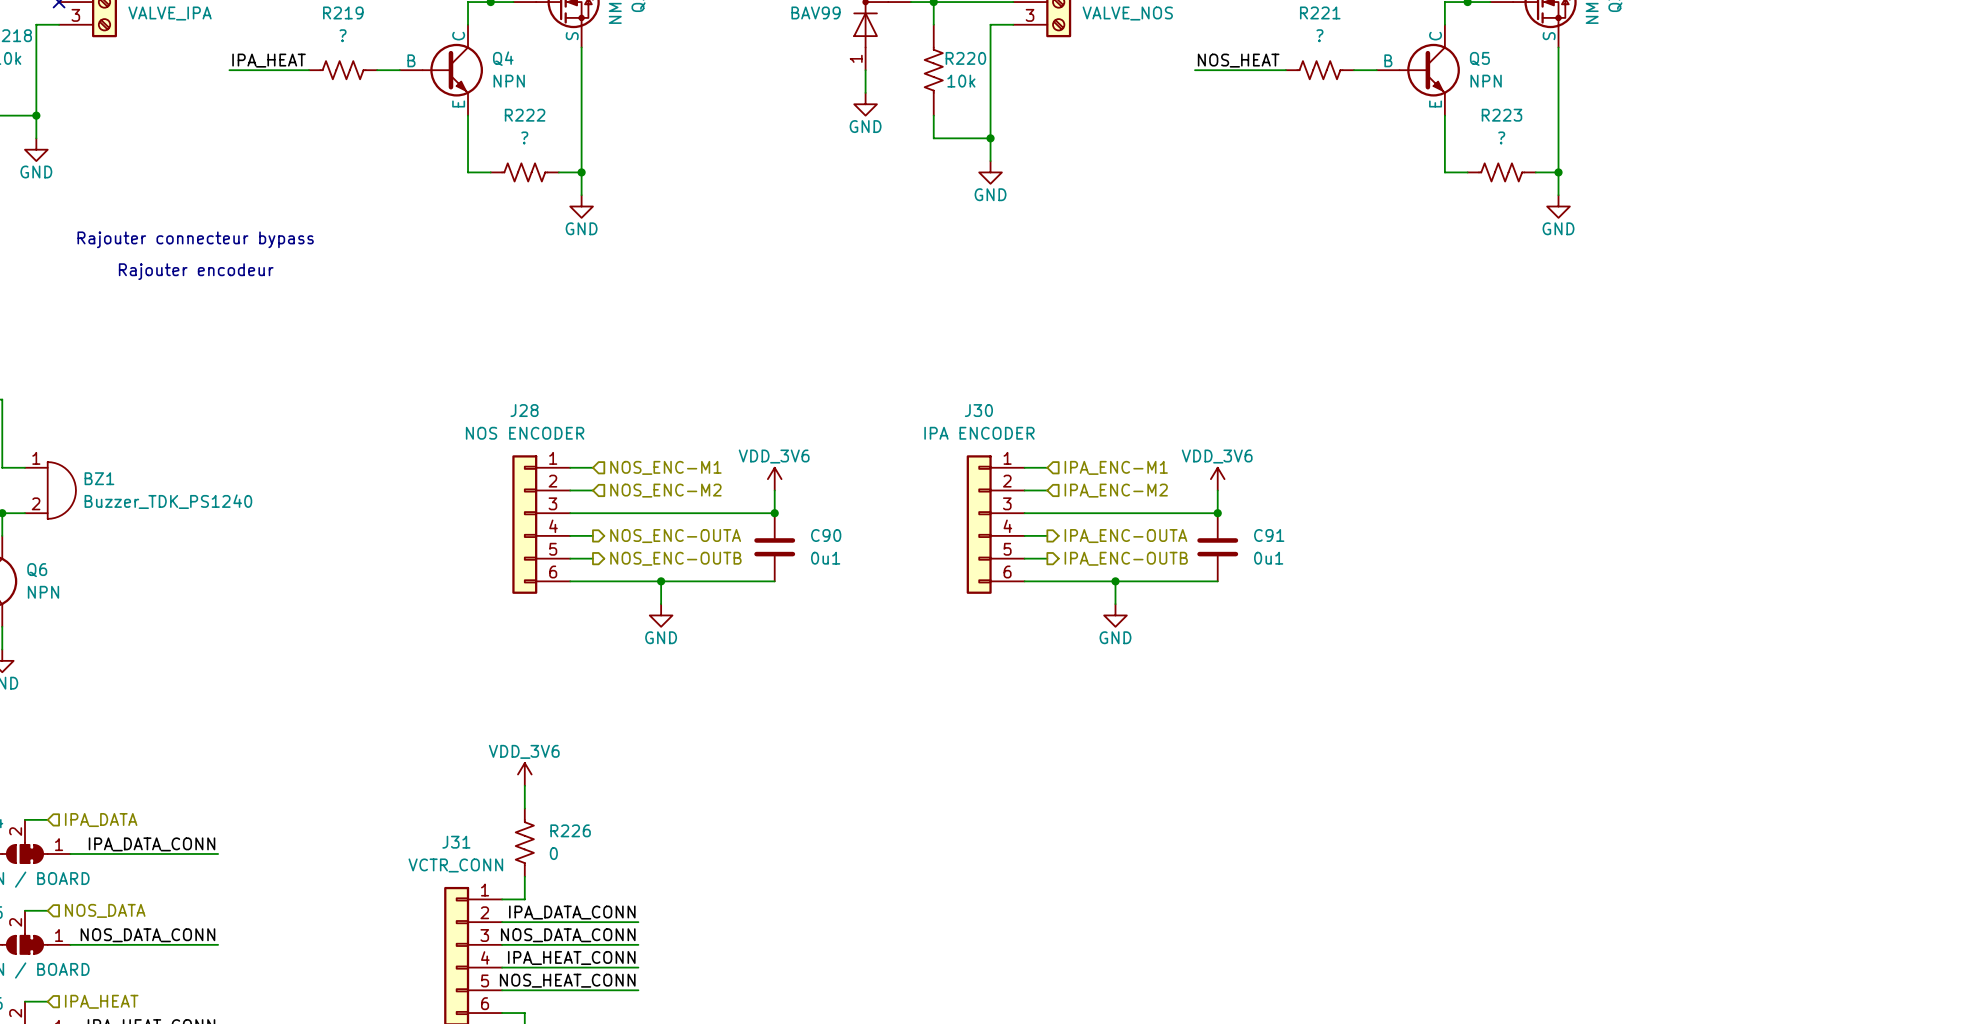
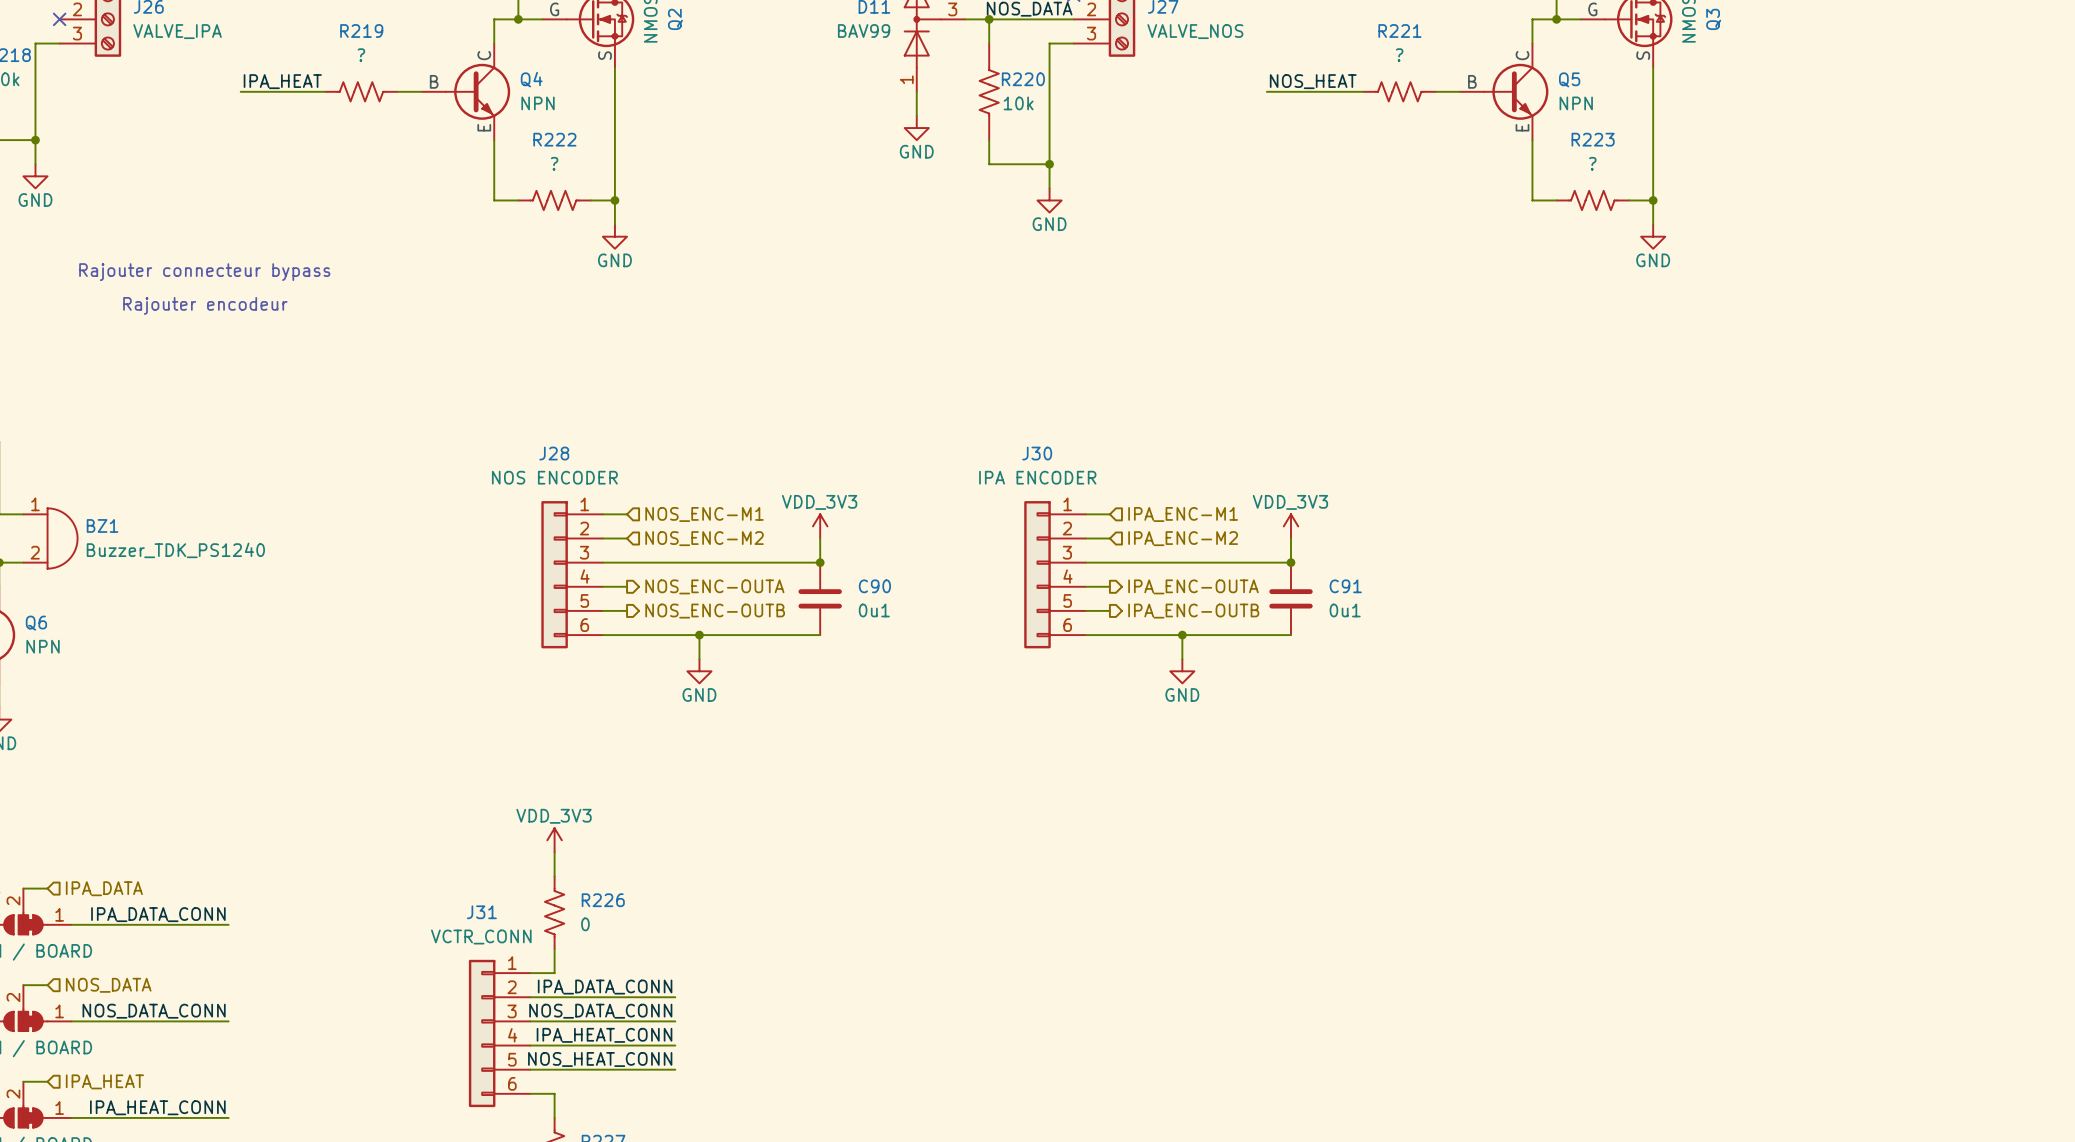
power symbol: VDD_3V6 (774, 479) -> VDD_3V3 (820, 526)
power symbol: VDD_3V6 (1217, 479) -> VDD_3V3 (1291, 526)
power symbol: VDD_3V6 (524, 774) -> VDD_3V3 (554, 840)

